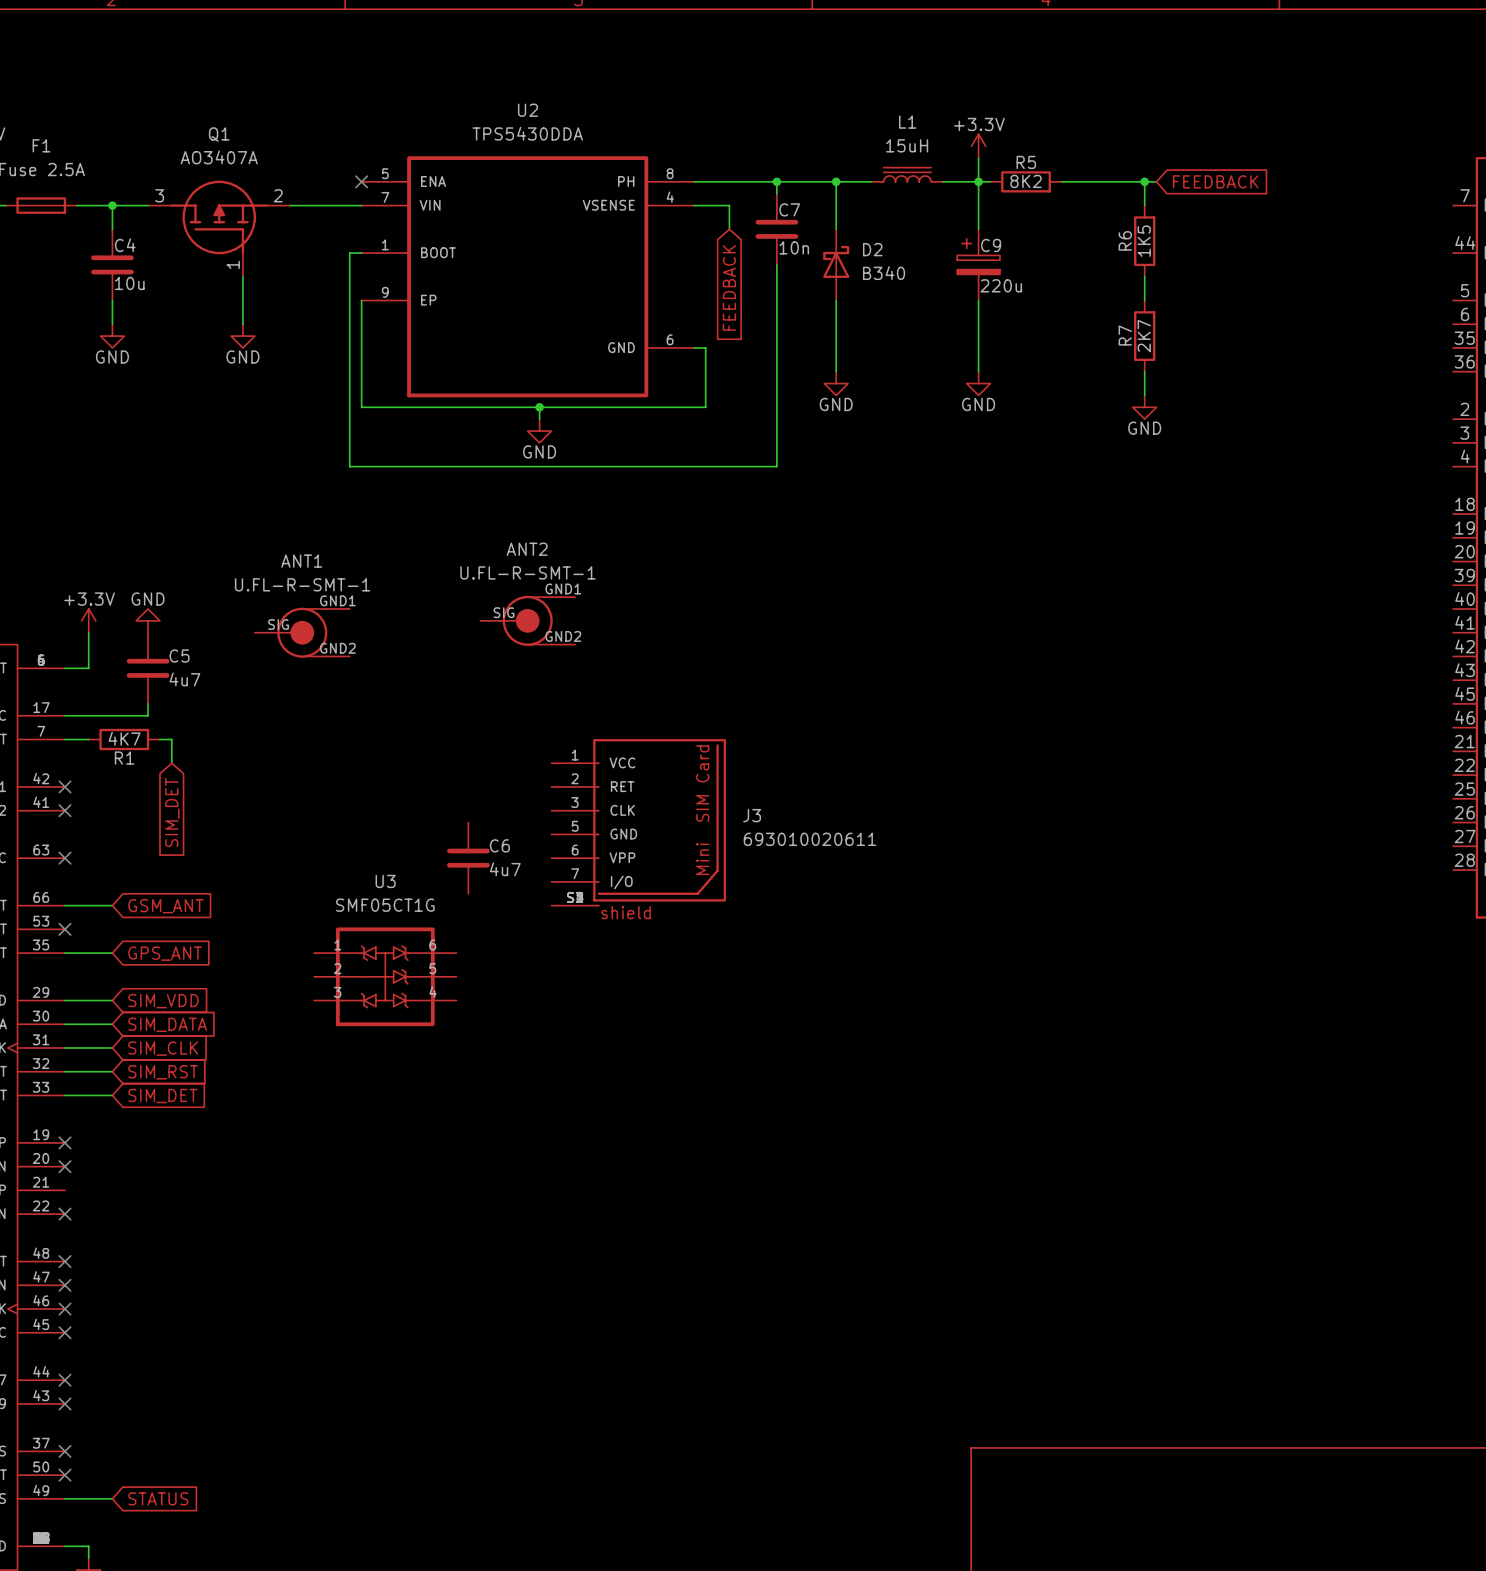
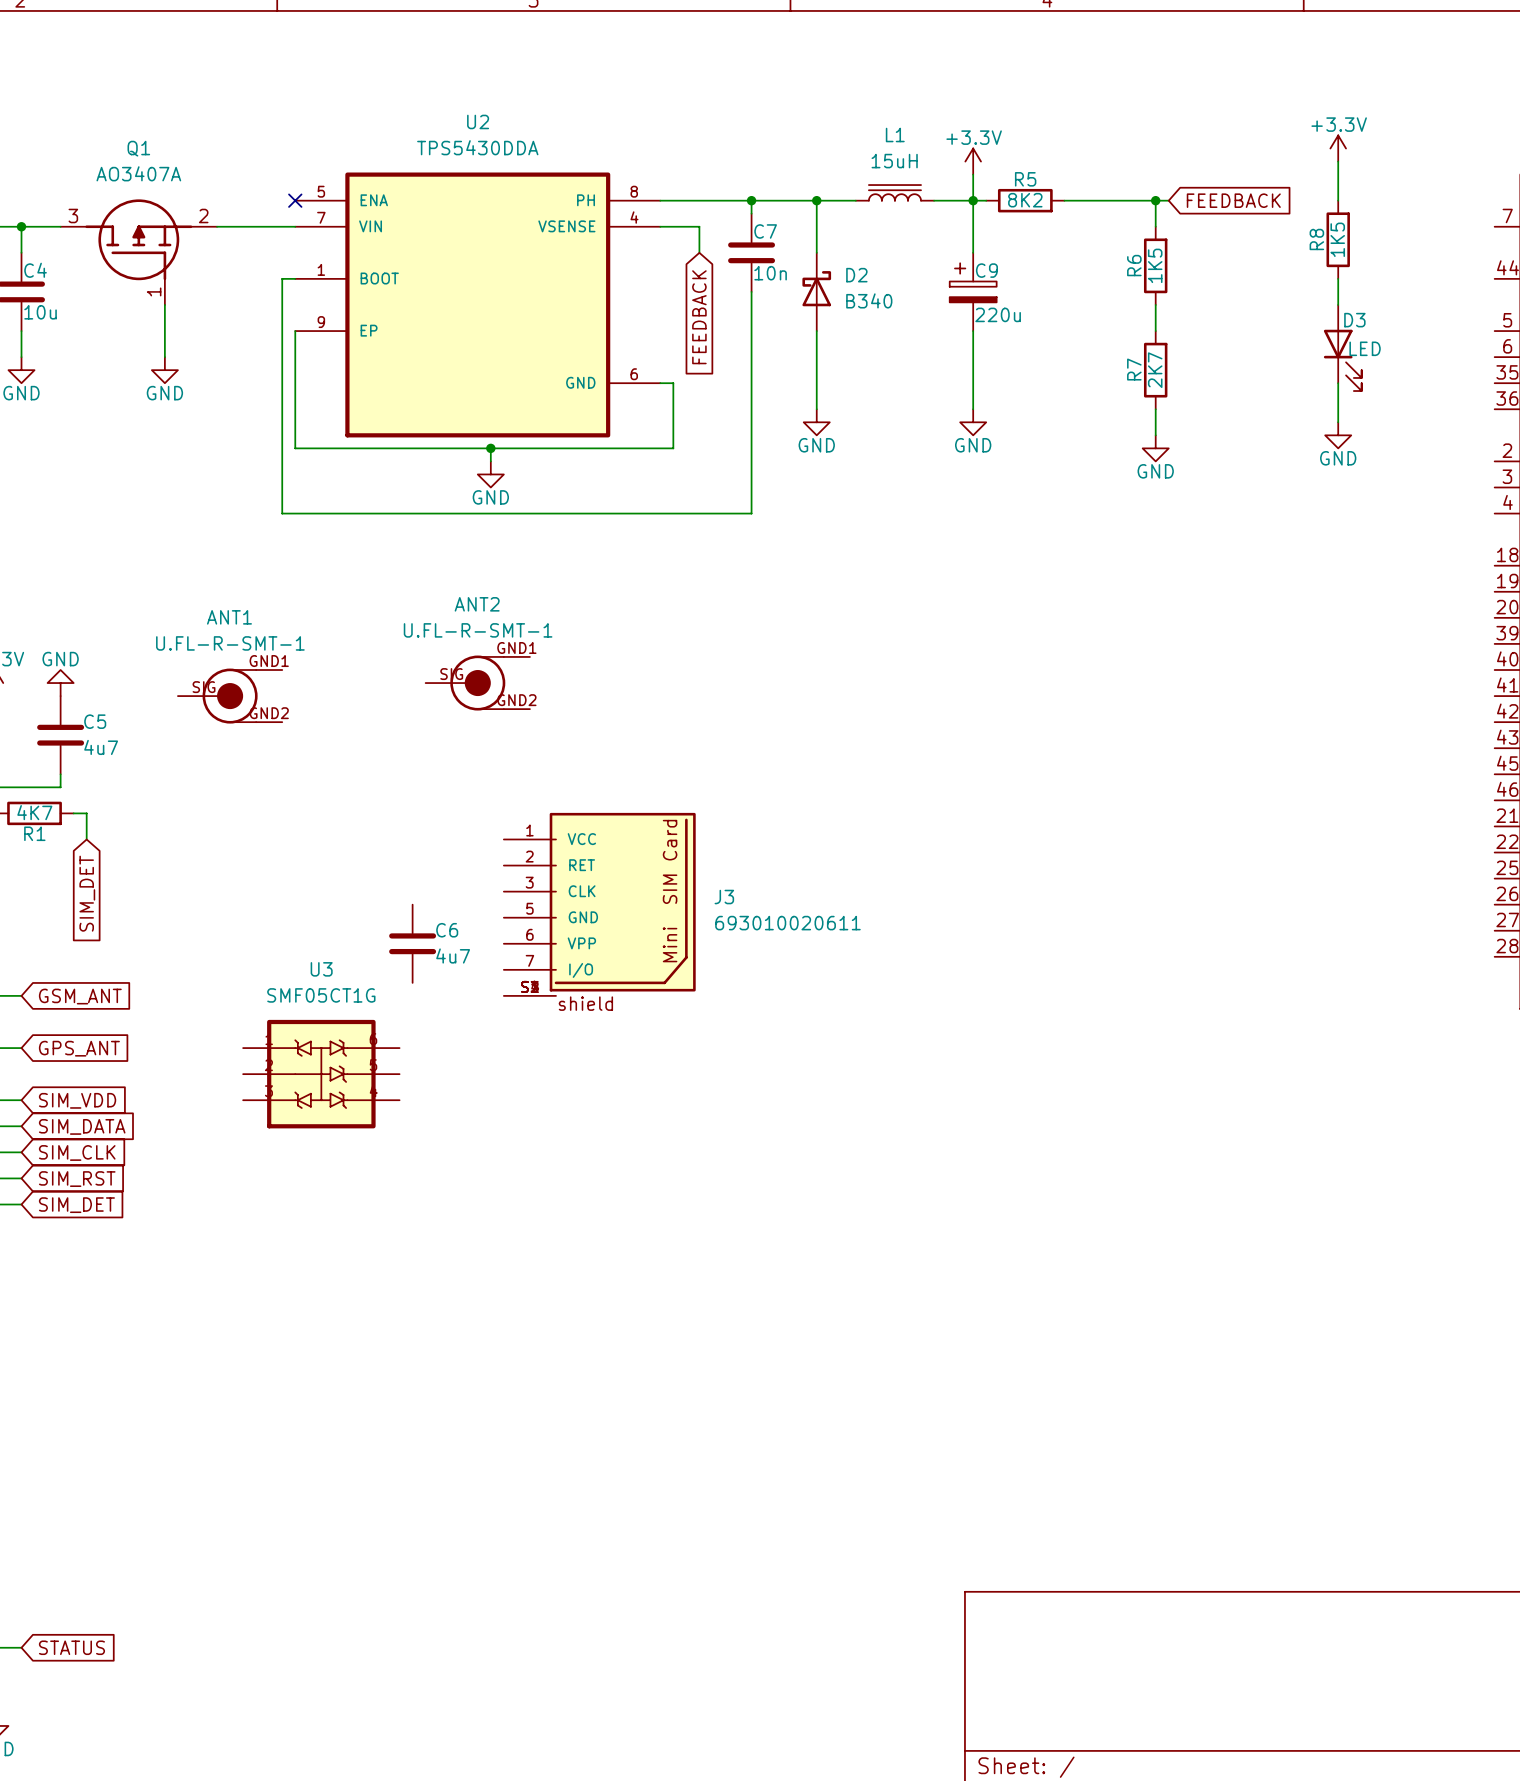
power symbol: none -> +3.3V (1338, 148)
wire: none -> (1338, 161) (1338, 200)
R8: none -> 1K5 (1338, 239)
wire: none -> (1338, 278) (1338, 304)
D3: none -> LED (1342, 347)
wire: none -> (1338, 383) (1338, 422)
power symbol: none -> GND (1338, 435)

